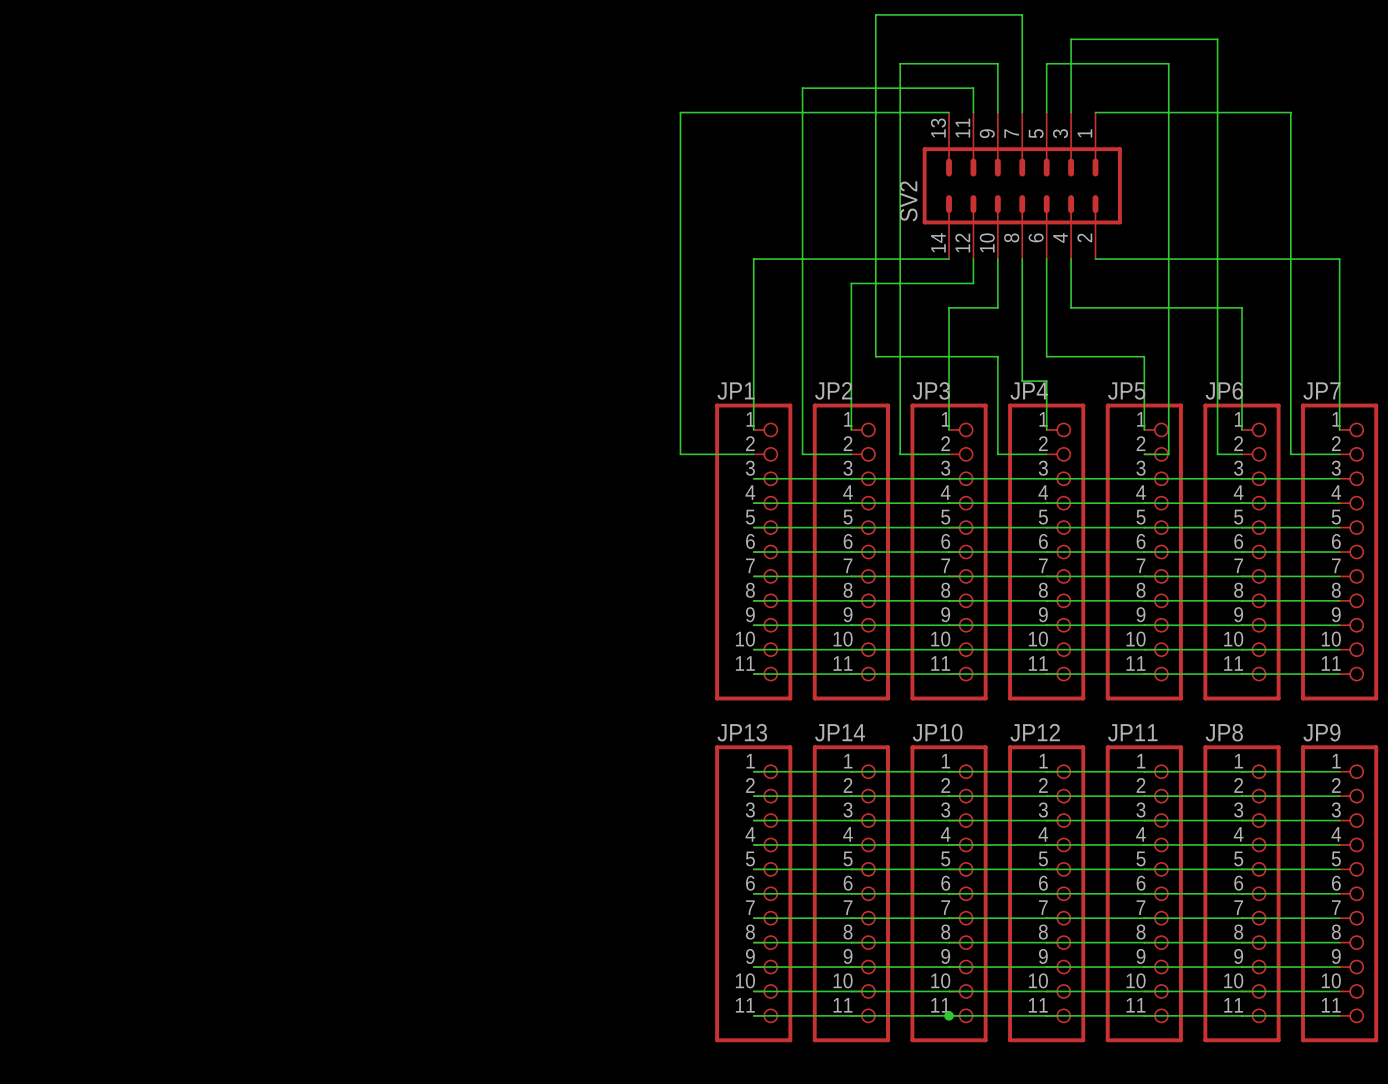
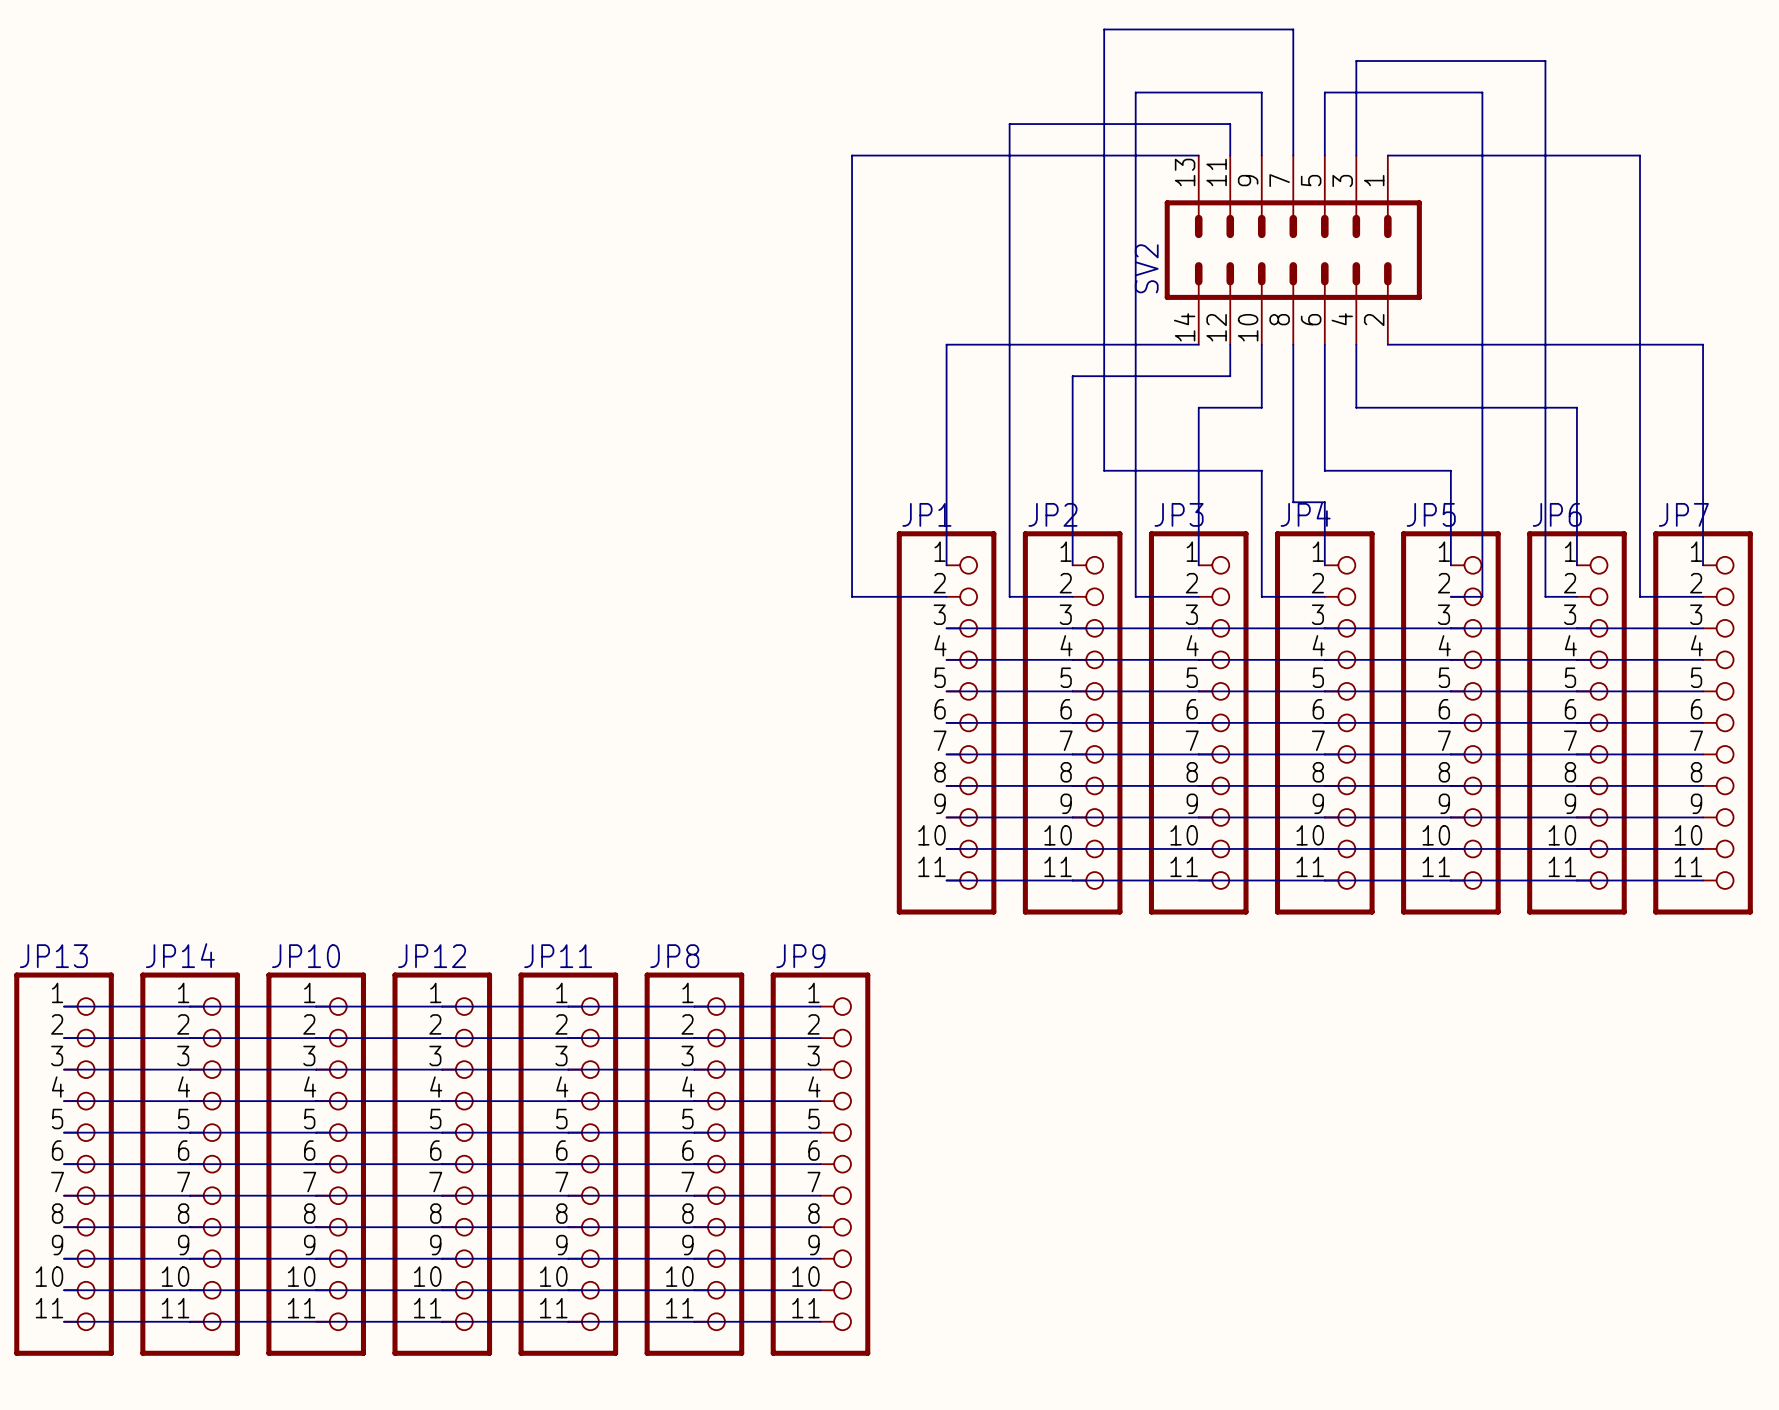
wire: none -> (64, 1006) (820, 1006)
wire: (753, 771) (1339, 771) -> none
wire: none -> (64, 1038) (820, 1038)
wire: (753, 796) (1339, 796) -> none
wire: none -> (64, 1069) (820, 1069)
wire: (753, 820) (1339, 820) -> none
wire: none -> (64, 1101) (820, 1101)
wire: (753, 844) (1339, 844) -> none
wire: none -> (64, 1132) (820, 1132)
wire: (753, 869) (1339, 869) -> none
wire: none -> (64, 1164) (820, 1164)
wire: (753, 893) (1339, 893) -> none
JP13 position: (753, 893) -> (64, 1164)
JP14 position: (851, 893) -> (190, 1164)
JP10 position: (949, 893) -> (316, 1164)
JP12 position: (1046, 893) -> (442, 1164)
JP11 position: (1144, 893) -> (568, 1164)
JP8 position: (1241, 893) -> (694, 1164)
JP9 position: (1339, 893) -> (820, 1164)
wire: none -> (64, 1195) (820, 1195)
wire: (753, 918) (1339, 918) -> none
wire: none -> (64, 1227) (820, 1227)
wire: (753, 942) (1339, 942) -> none
wire: none -> (64, 1258) (820, 1258)
wire: (753, 967) (1339, 967) -> none
wire: none -> (64, 1290) (820, 1290)
wire: (753, 991) (1339, 991) -> none
wire: none -> (64, 1321) (820, 1321)
wire: (753, 1015) (1339, 1015) -> none
junction: (949, 1015) -> none

